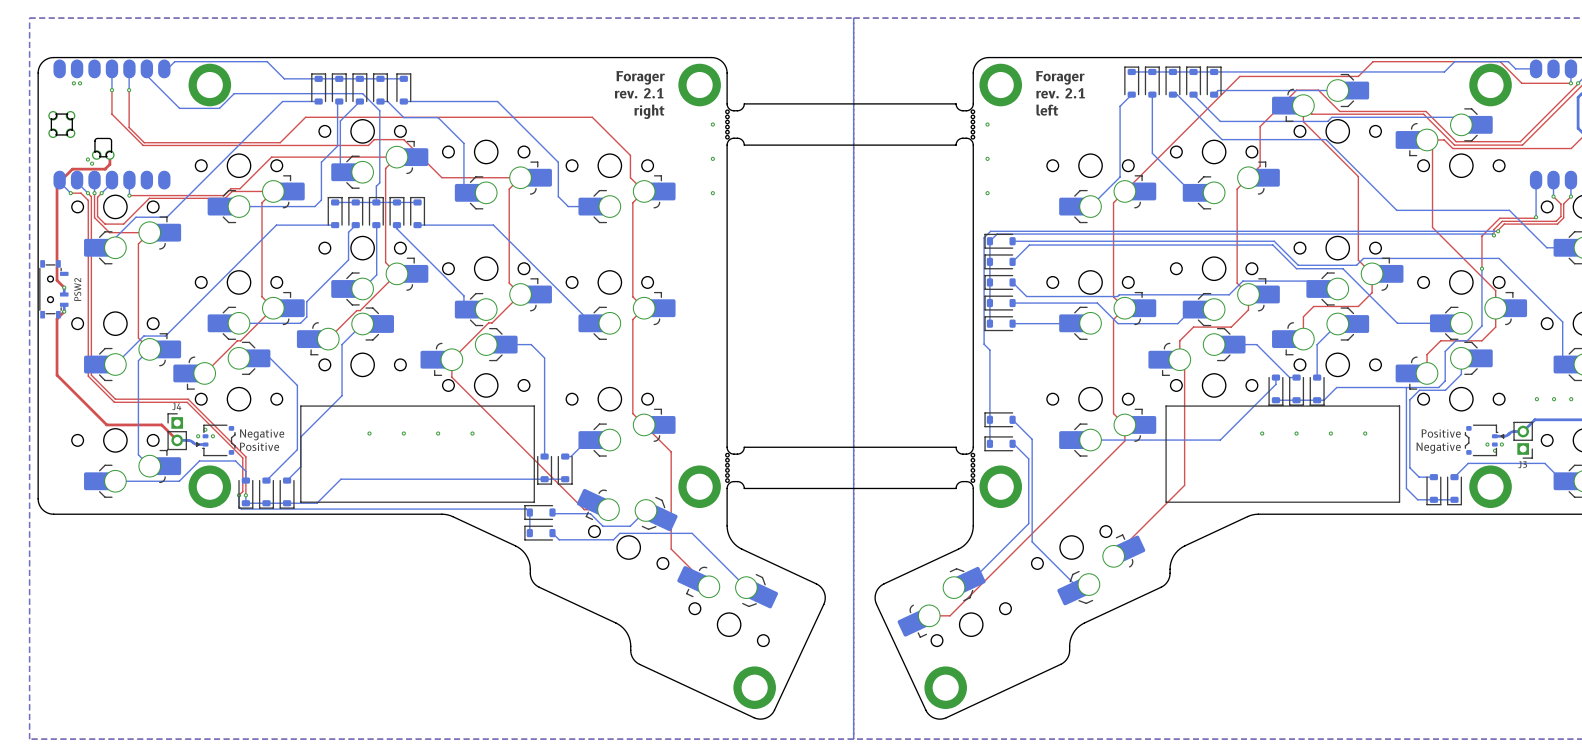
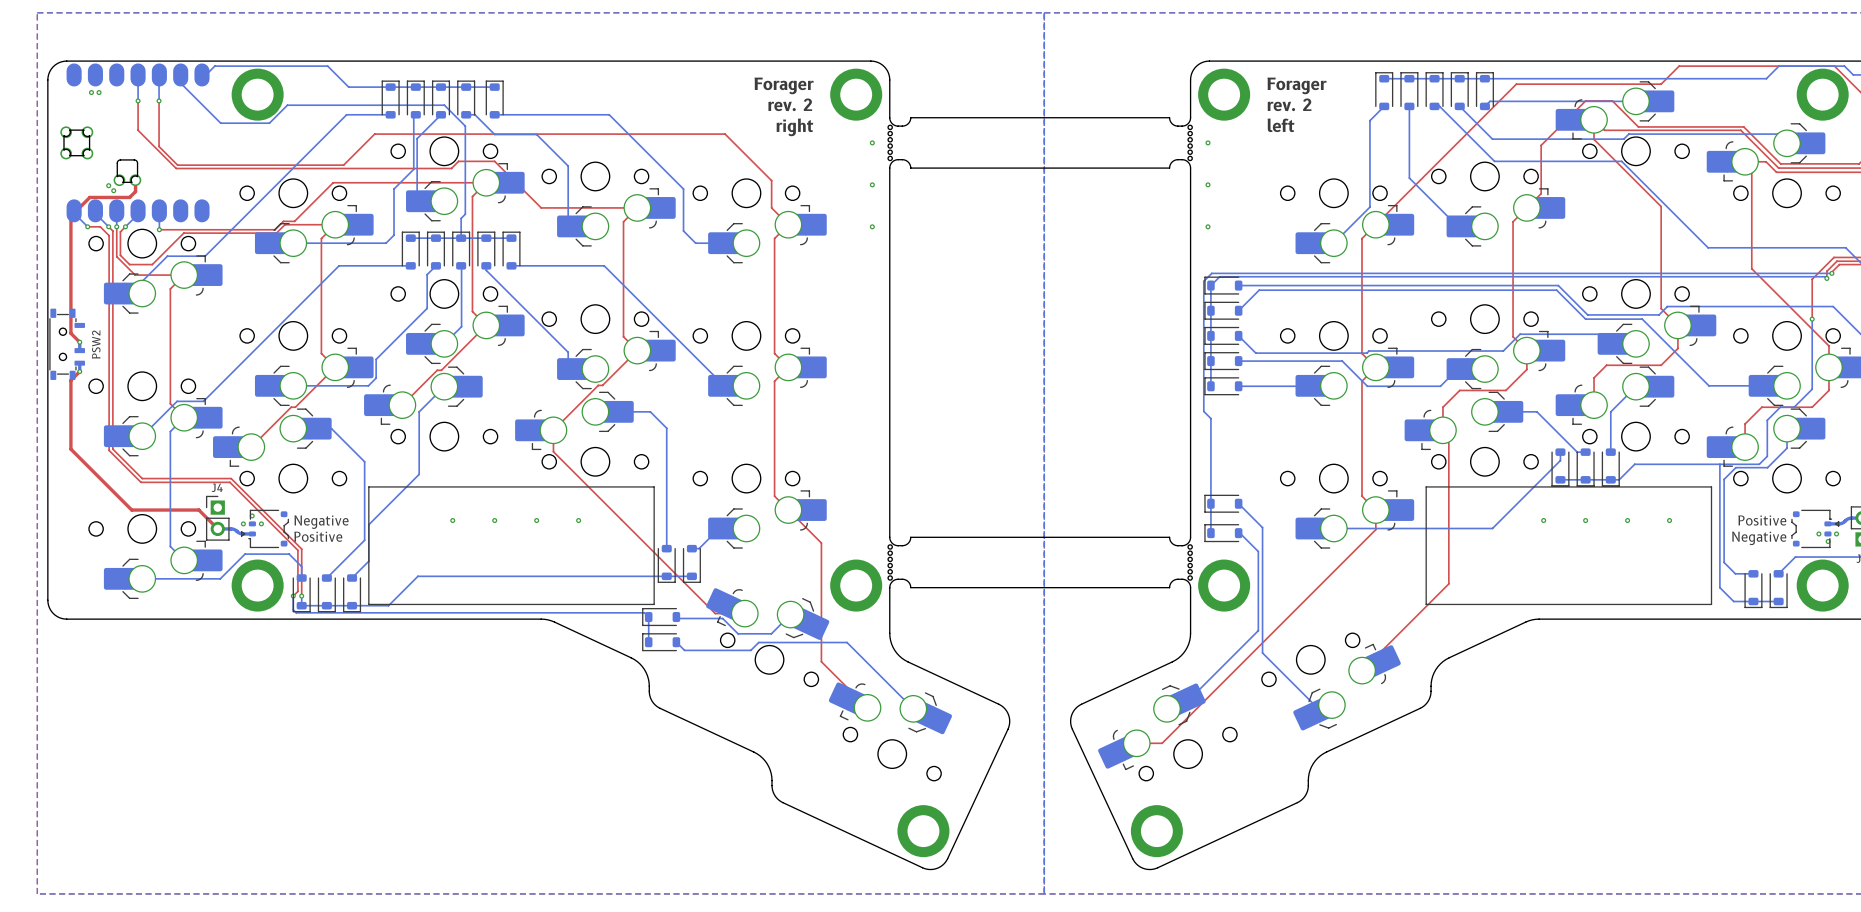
text: rev. 2.1 (639, 93) -> rev. 2 (790, 104)
text: rev. 2.1 (1060, 93) -> rev. 2 (1289, 104)

